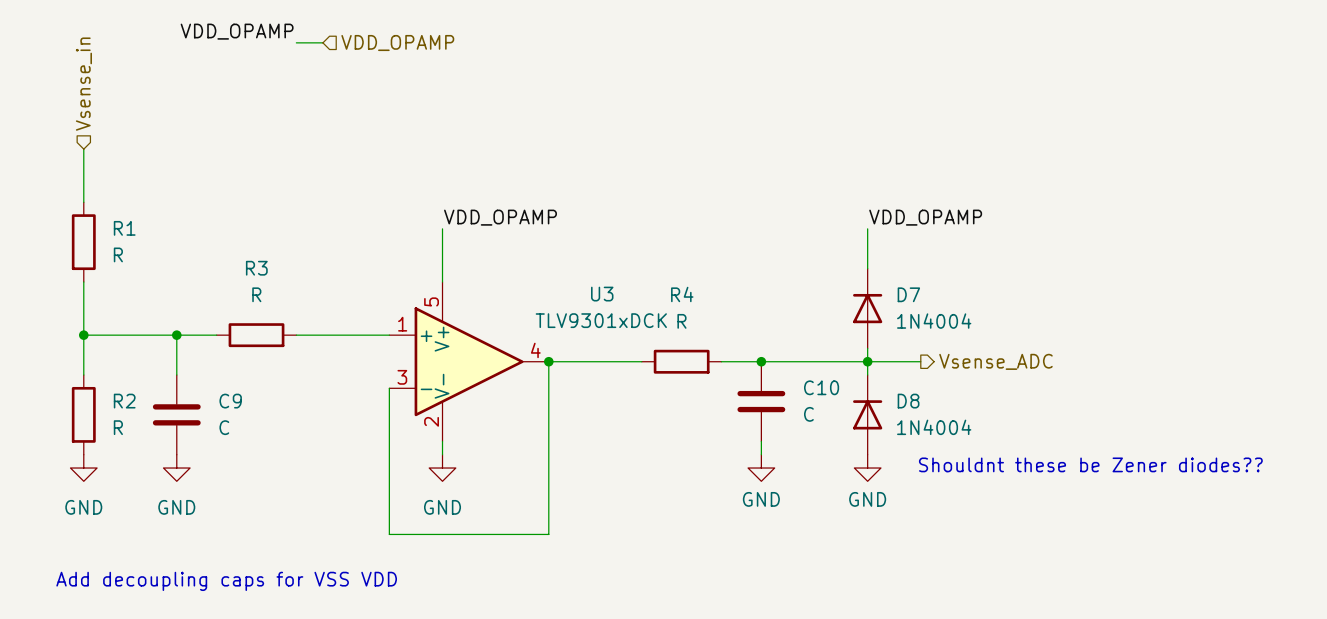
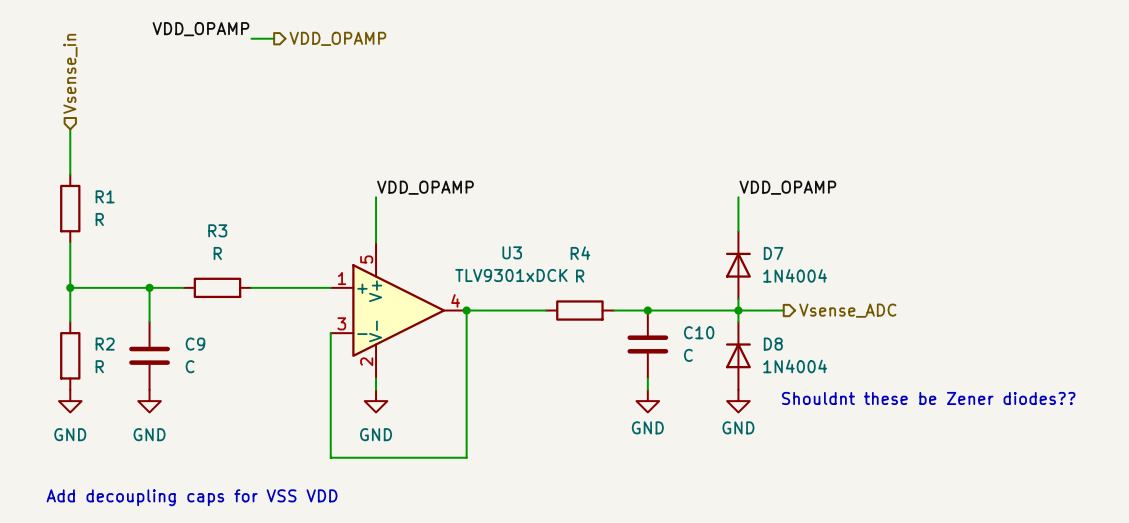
hierarchical label shape: input (397, 43) -> output (337, 38)

